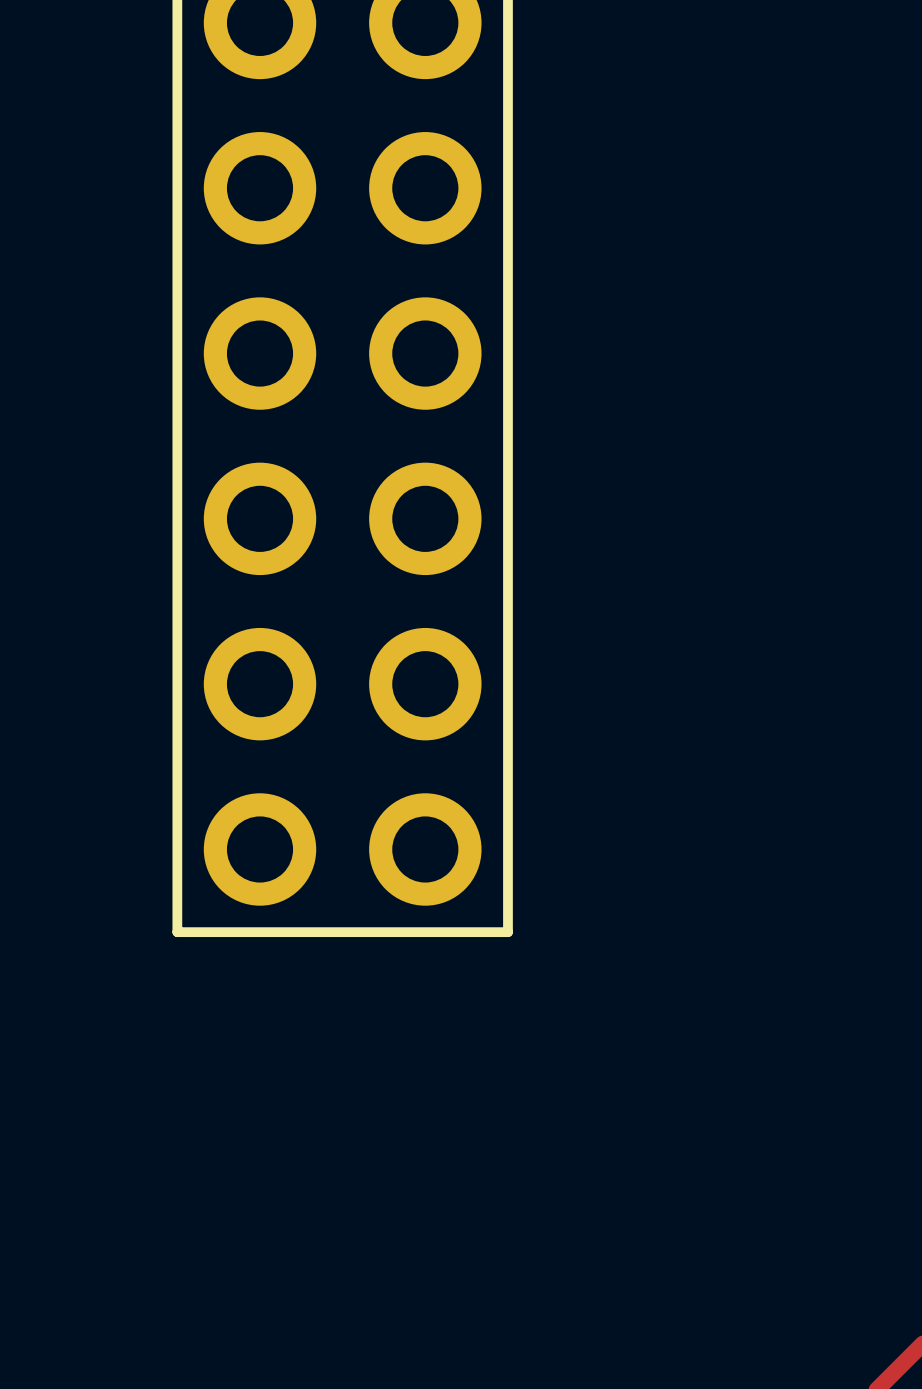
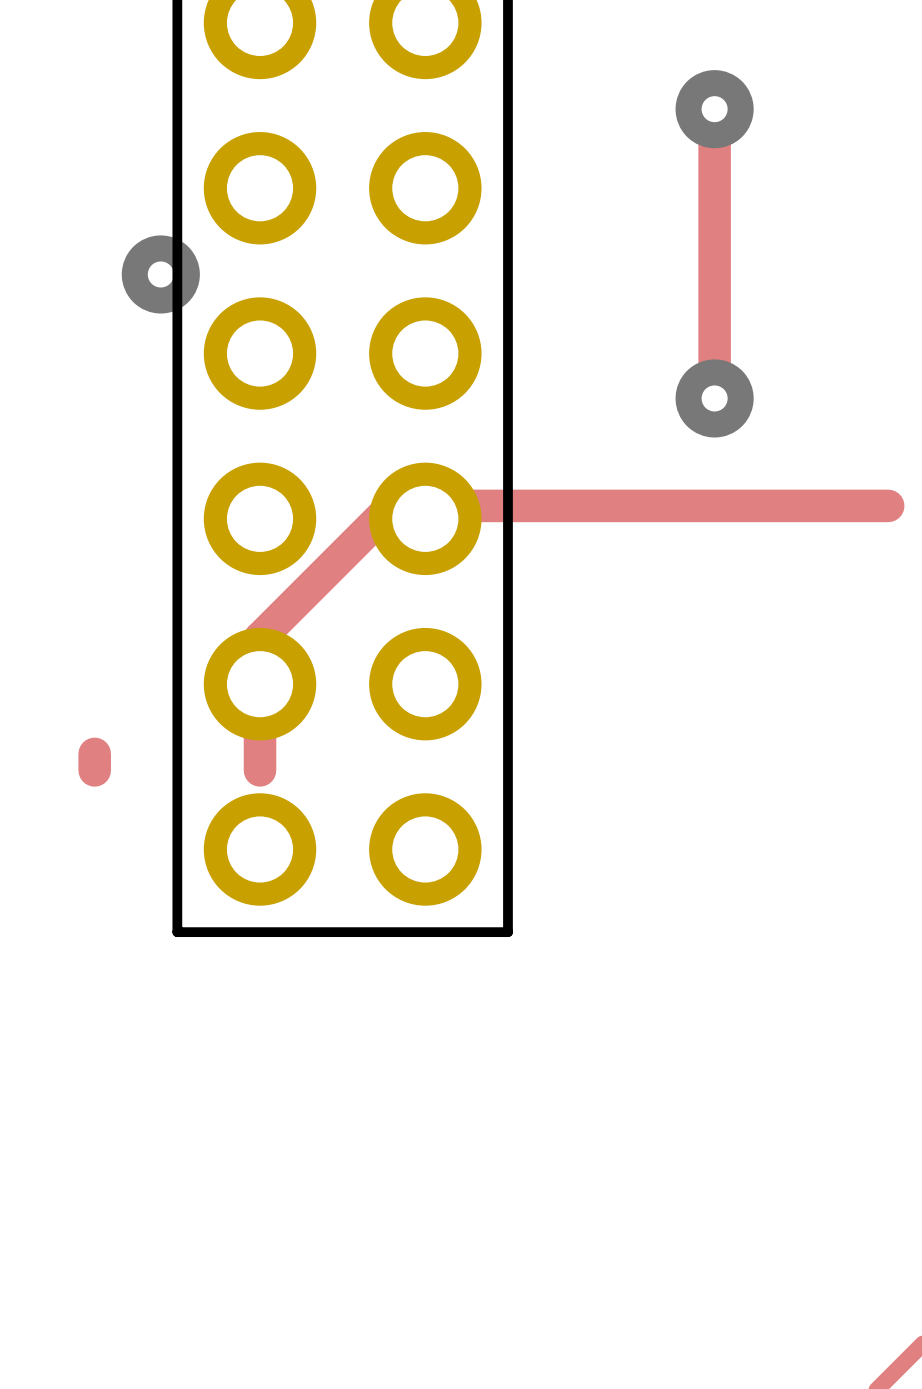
track: none -> (714, 109) (714, 398)
via: none -> (714, 109)
via: none -> (160, 274)
via: none -> (714, 398)
track: none -> (888, 505) (392, 505) (260, 638) (260, 770)
track: none -> (94, 753) (94, 770)

